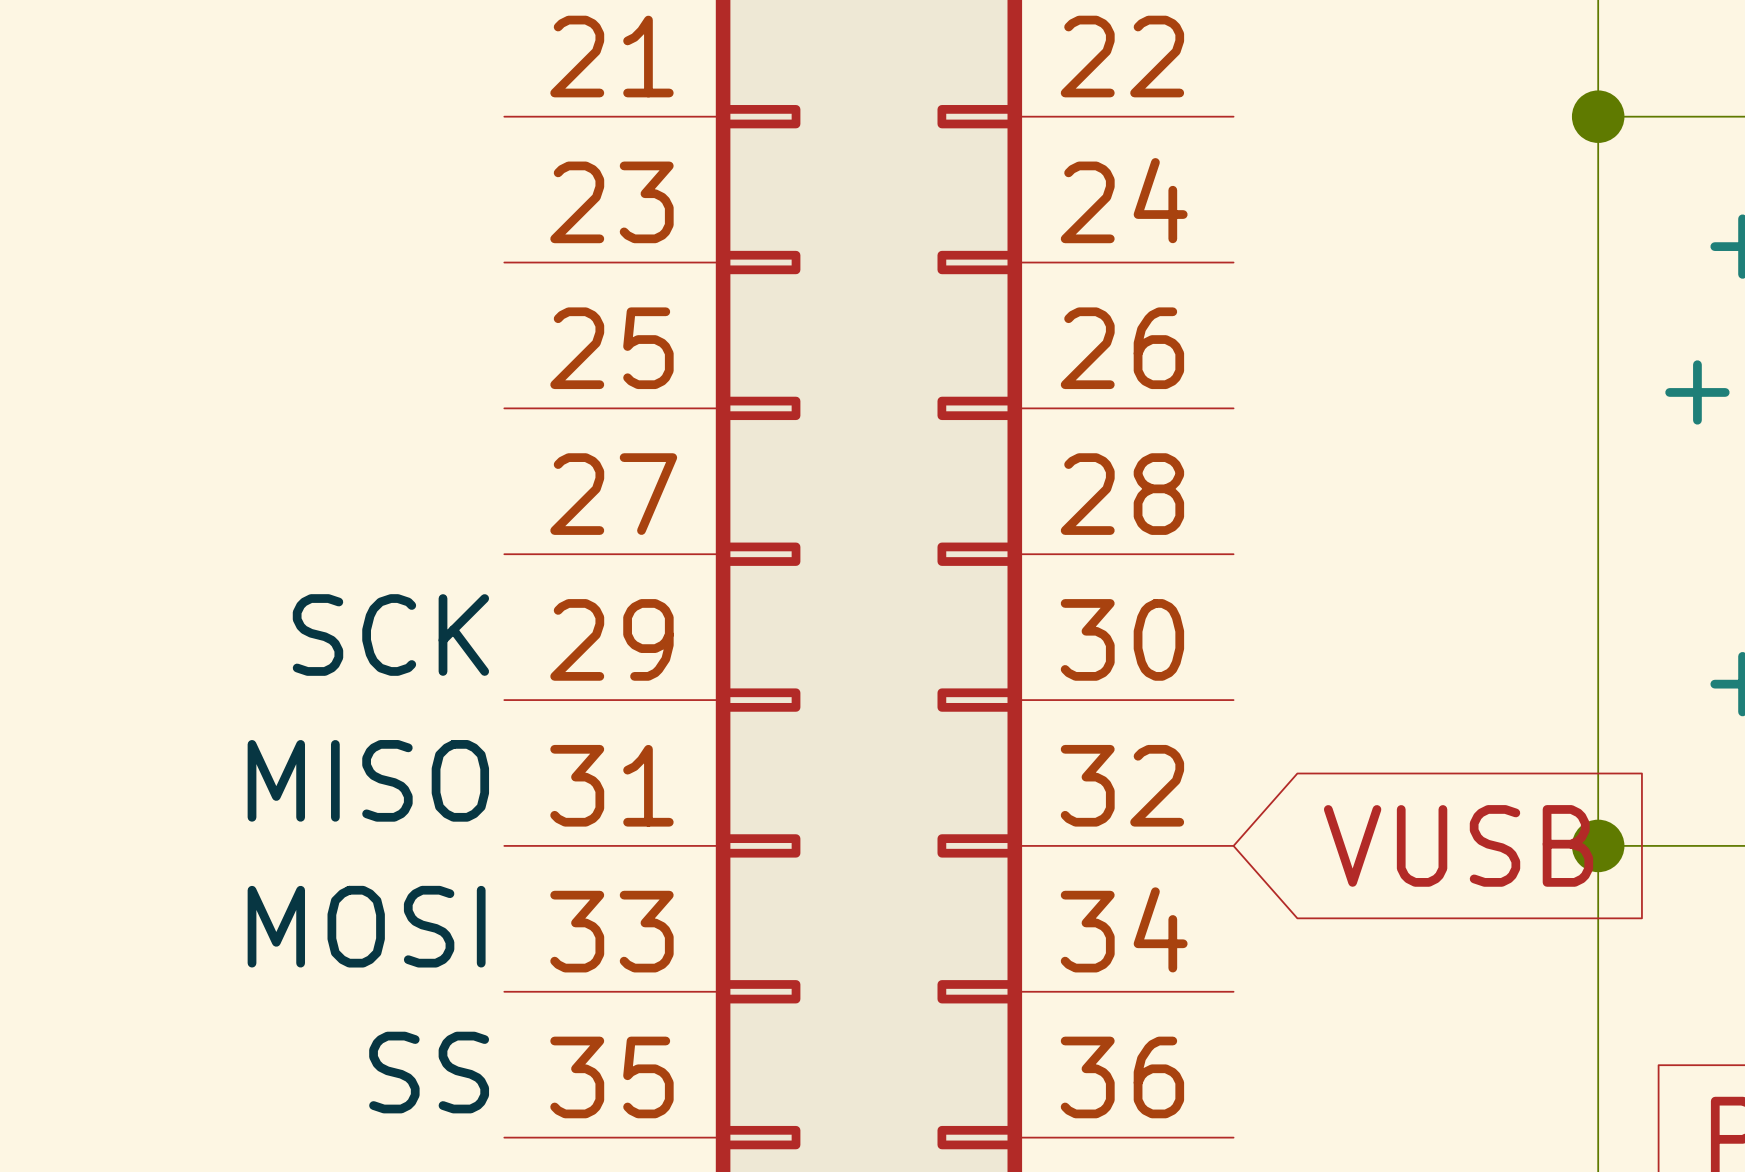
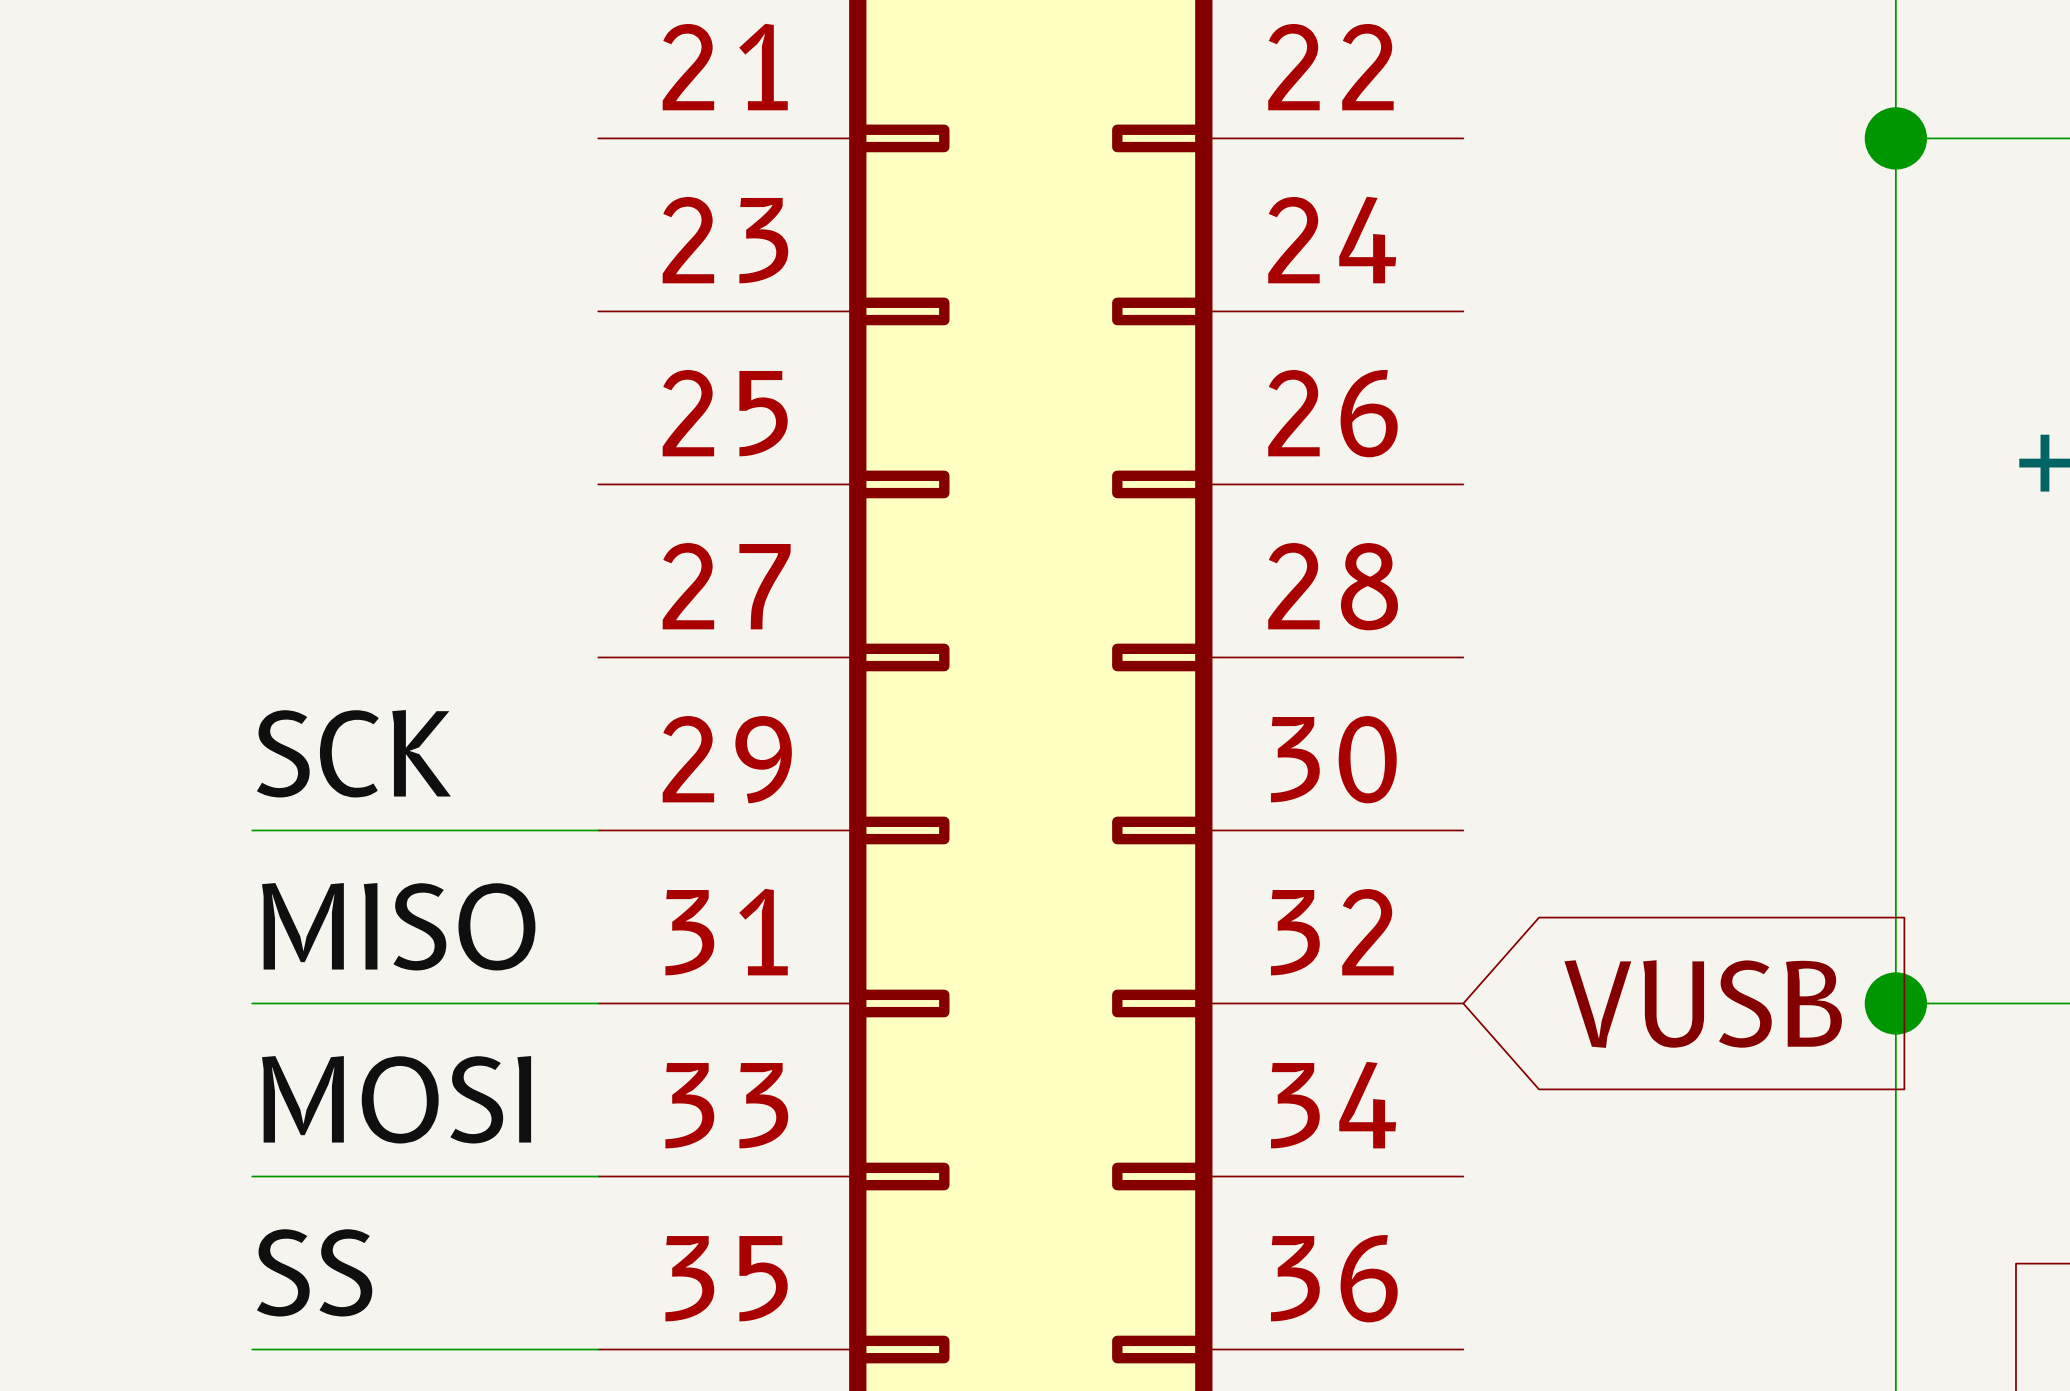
label position: SCK (390, 635) -> SCK (353, 753)
wire: none -> (252, 830) (598, 830)
label position: MISO (368, 780) -> MISO (398, 926)
wire: none -> (252, 1003) (598, 1003)
label position: MOSI (366, 926) -> MOSI (396, 1099)
wire: none -> (252, 1176) (598, 1176)
label position: SS (429, 1072) -> SS (314, 1272)
wire: none -> (252, 1349) (598, 1349)

